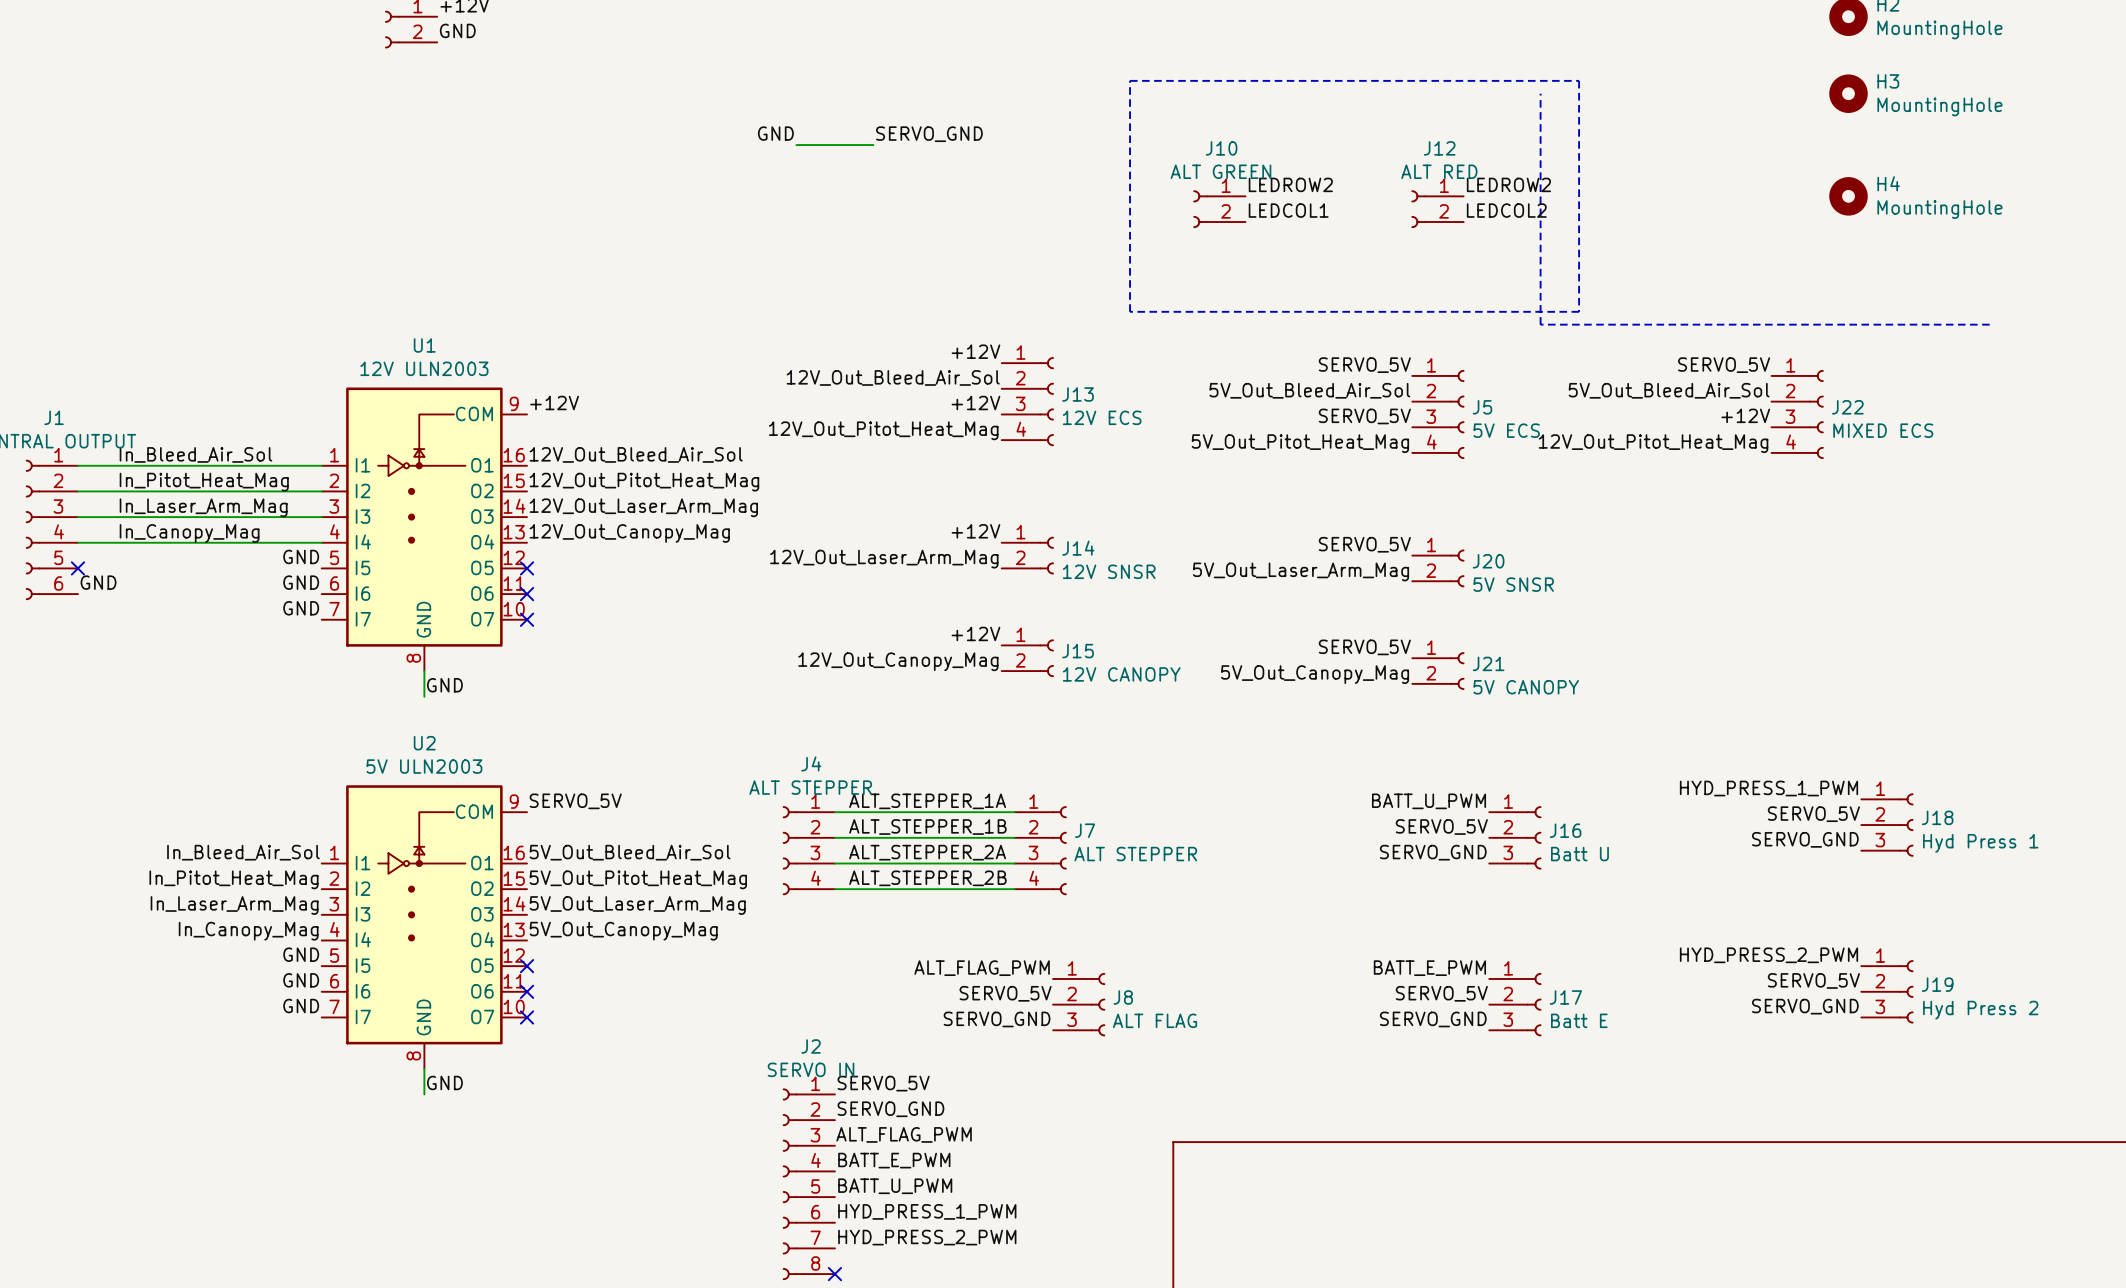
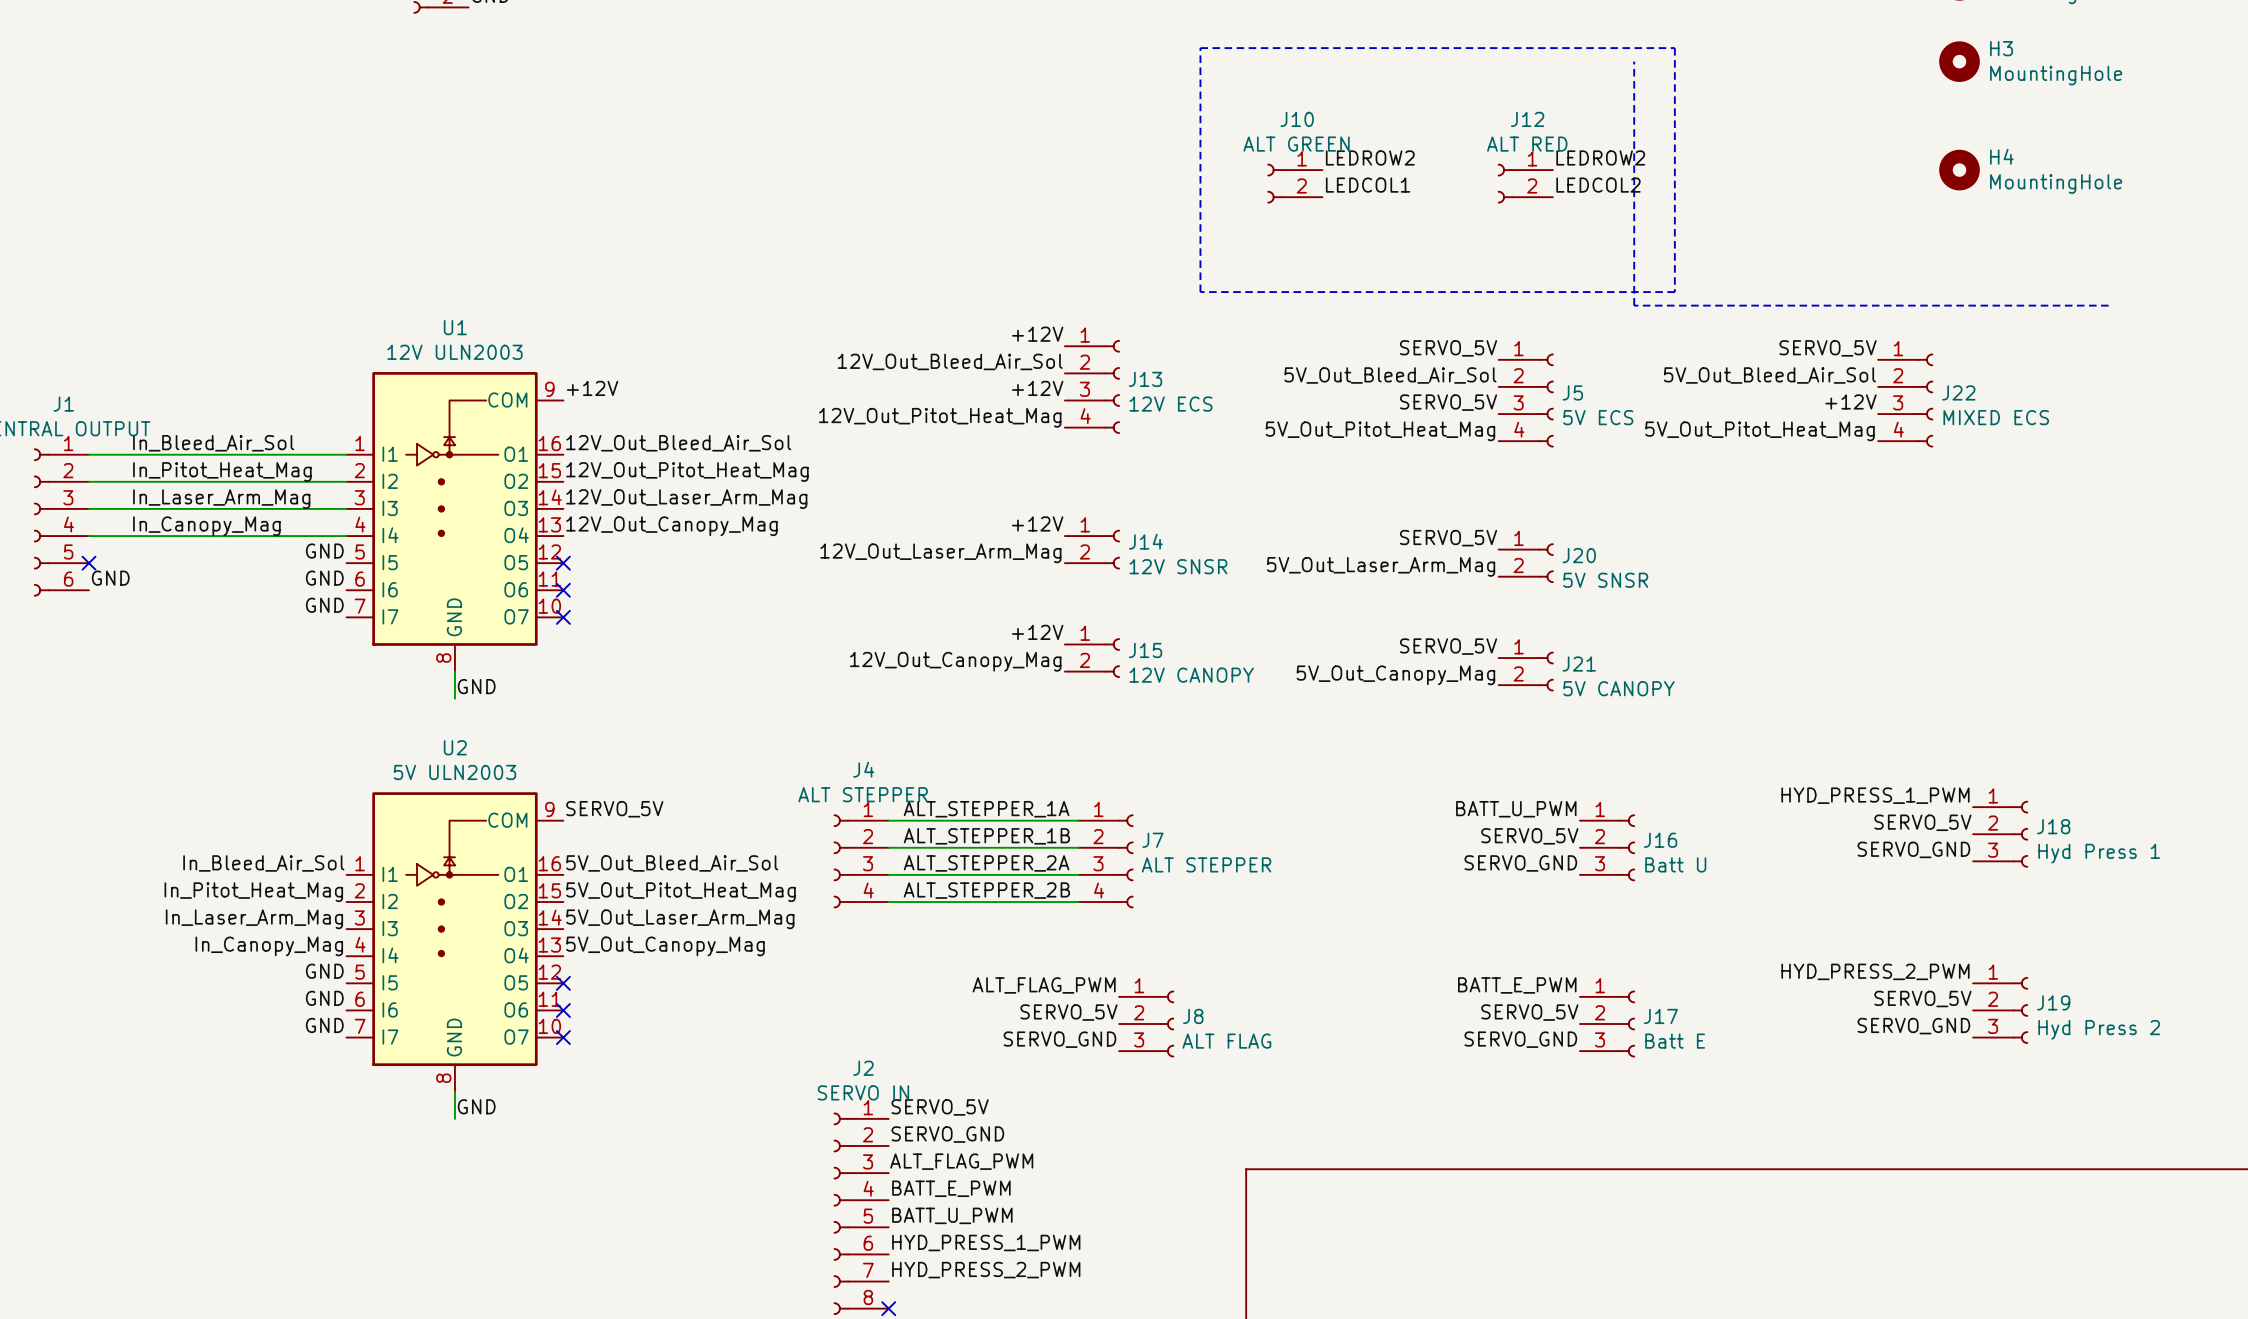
label: GND (775, 133) -> none
label: SERVO_GND (929, 134) -> none
wire: (796, 145) (873, 145) -> none
label: 12V_Out_Pitot_Heat_Mag (1653, 443) -> 5V_Out_Pitot_Heat_Mag (1759, 431)

